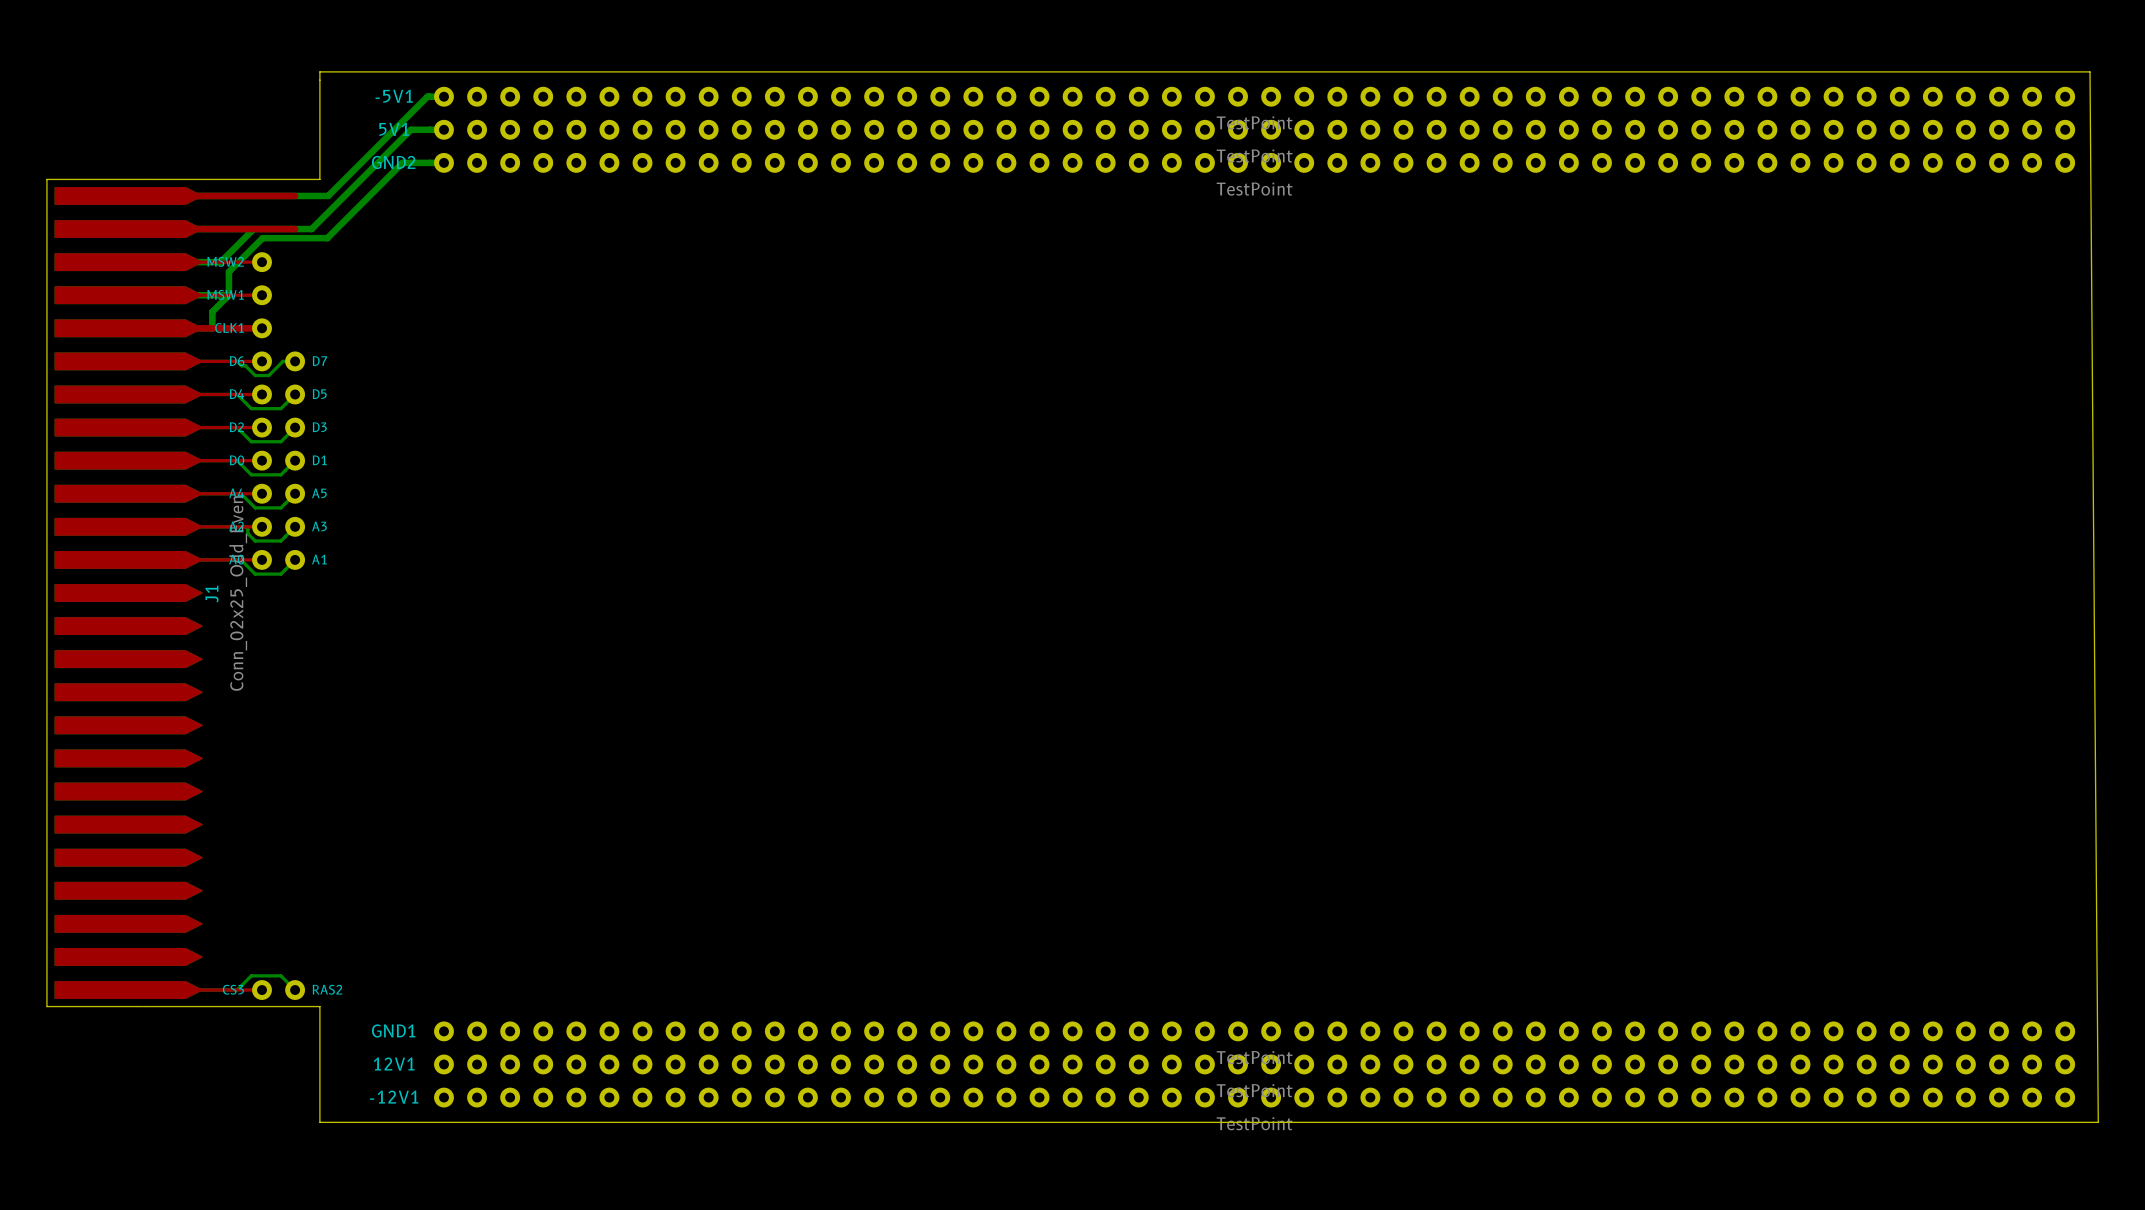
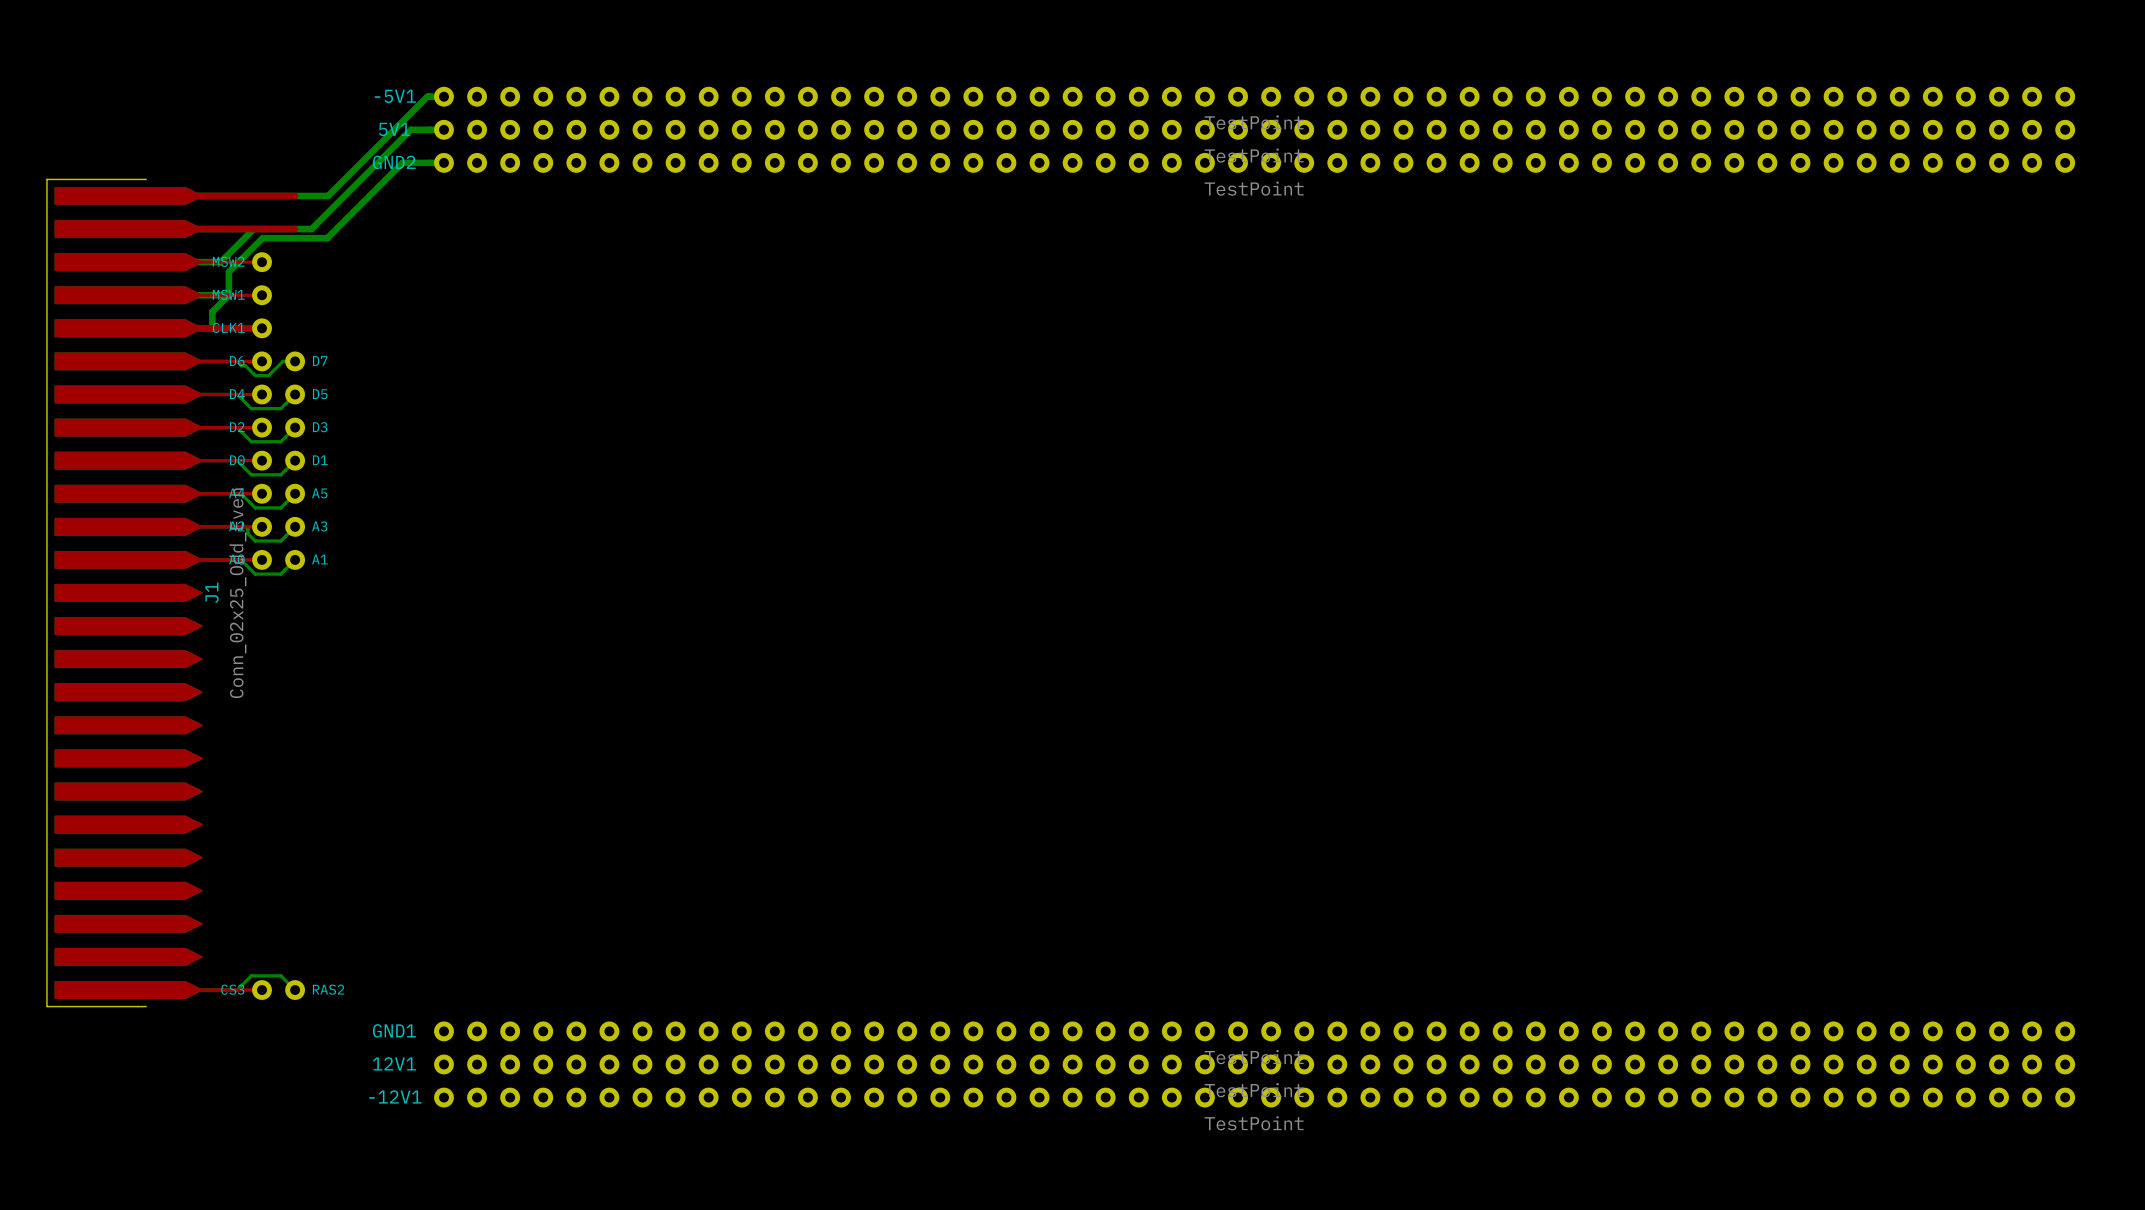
board edge: (146, 179) (319, 179) (319, 71) (2089, 71) (2098, 1122) (319, 1122) (319, 1006) (146, 1006) -> none

